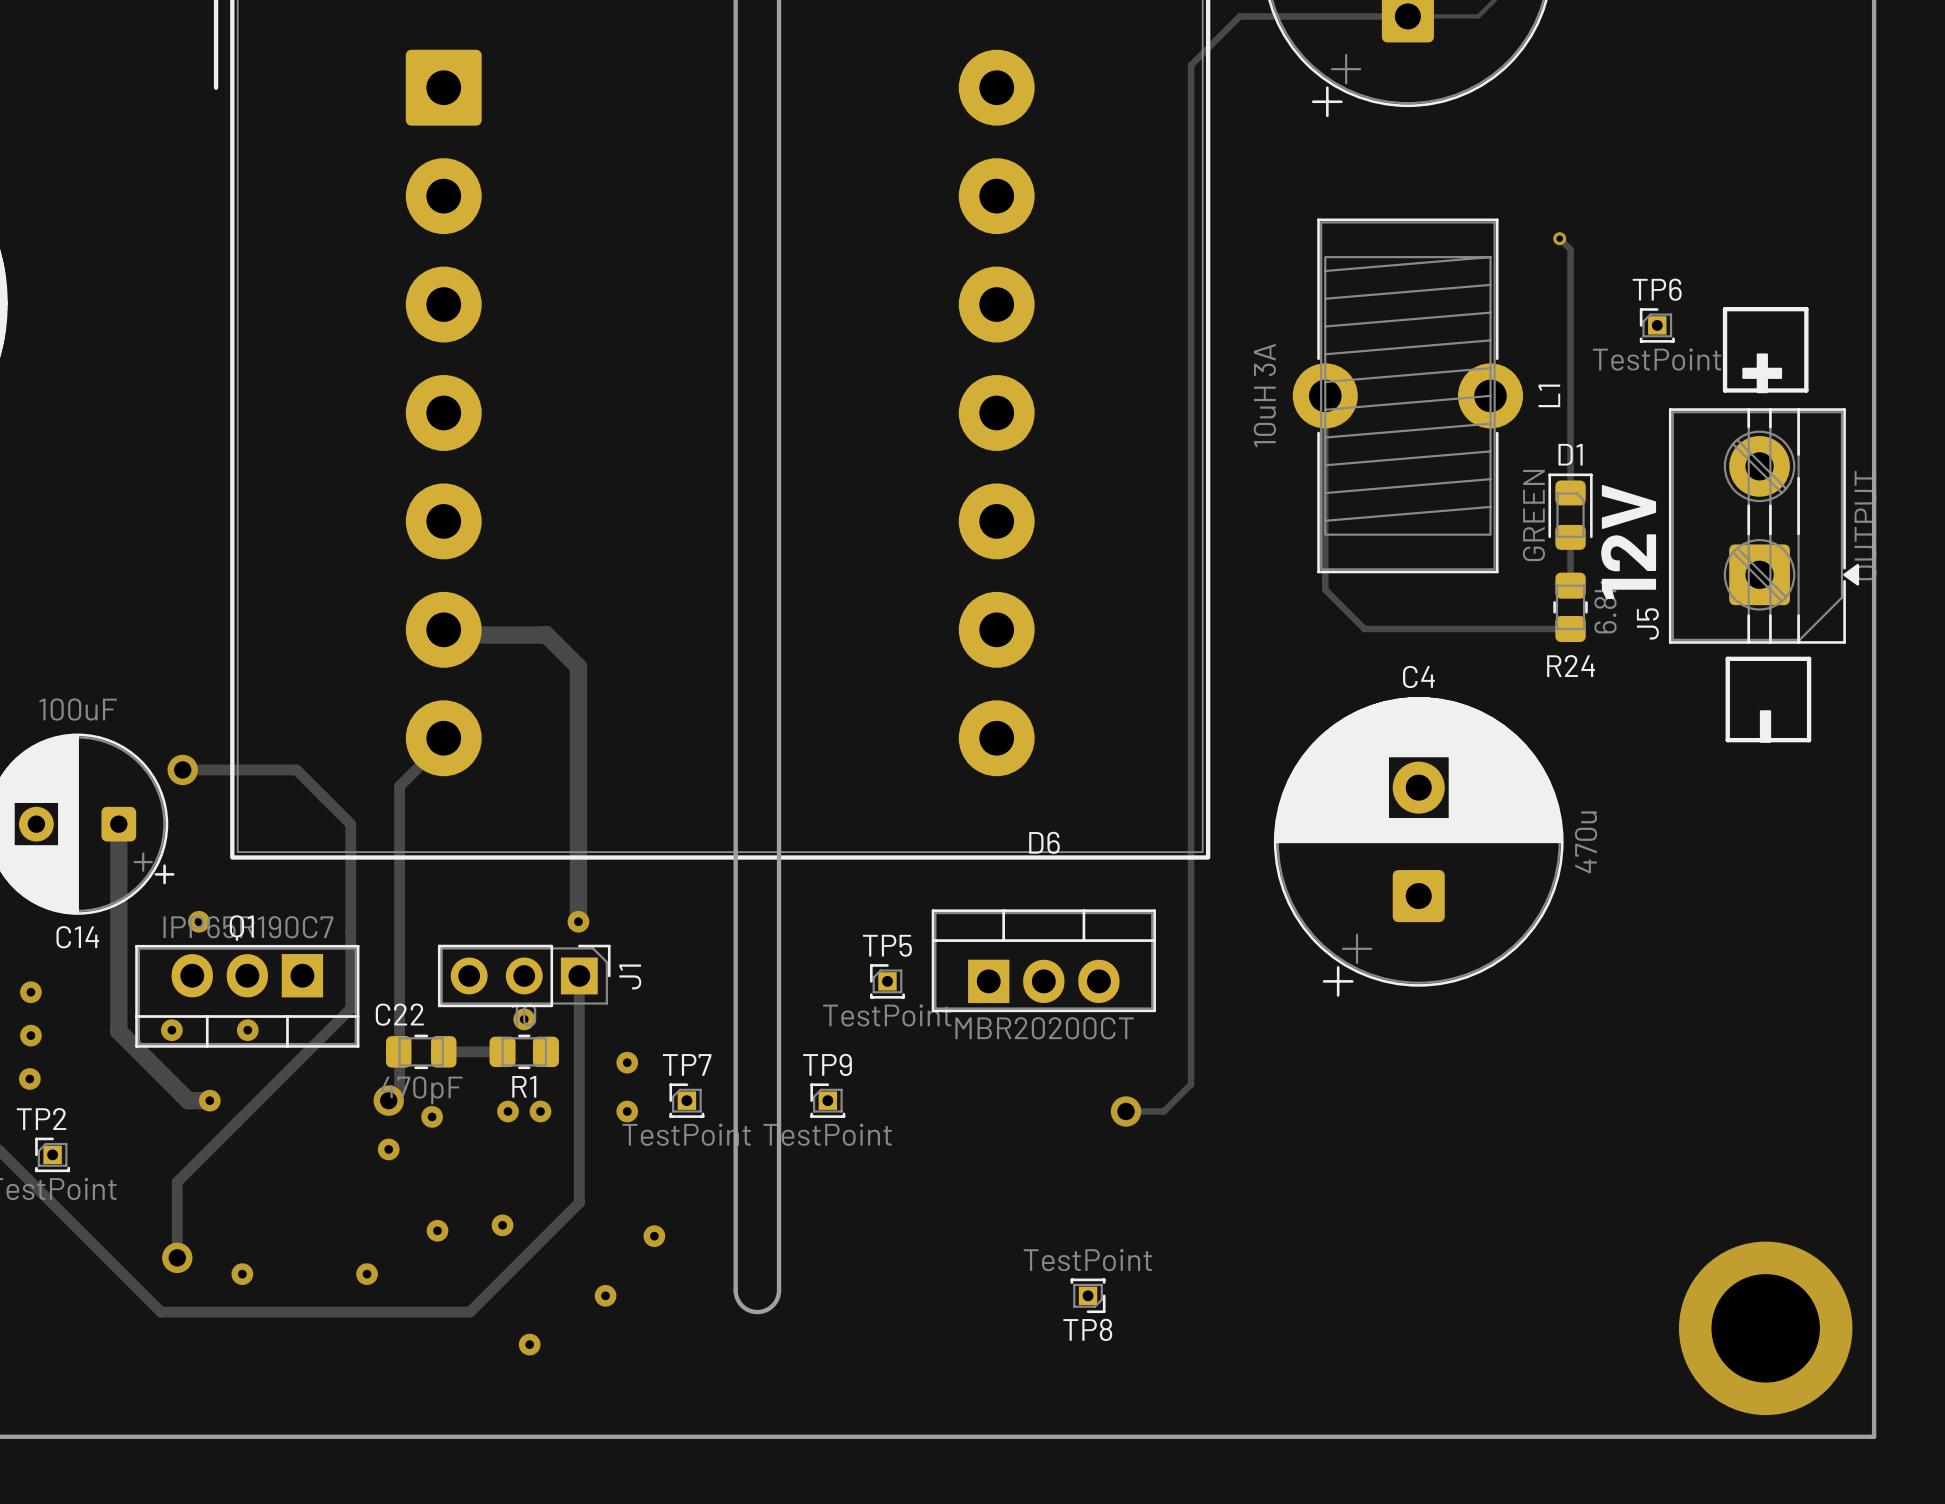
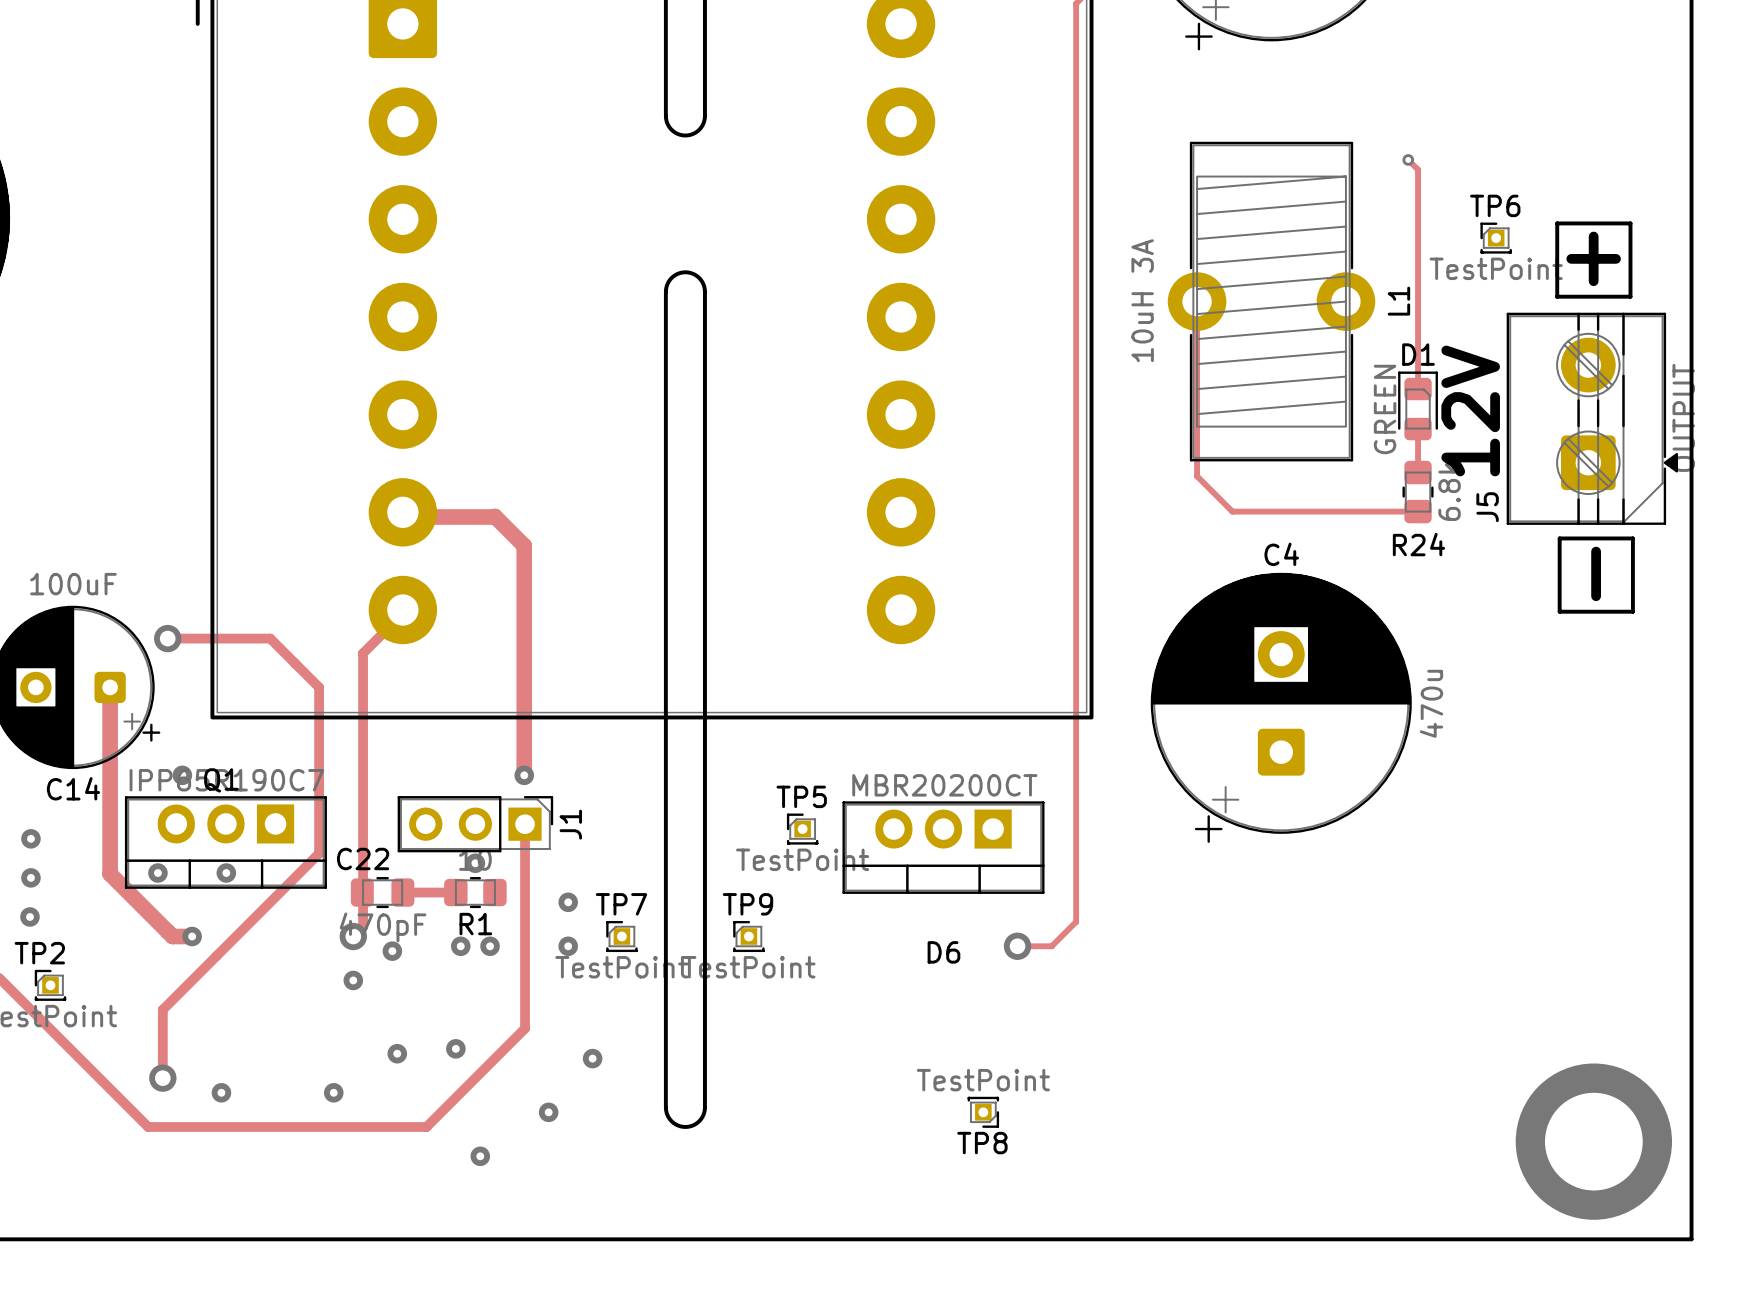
board edge: (735, 189) (735, 385) -> (665, 115) (671, 129) (685, 135) (699, 129) (704, 115)
board edge: (779, 189) (779, 385) -> (665, 291) (671, 278) (685, 272) (699, 278) (704, 291)
D6 rotation: 0° (1043, 960) -> 180° (943, 847)

